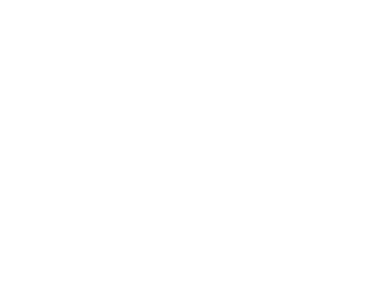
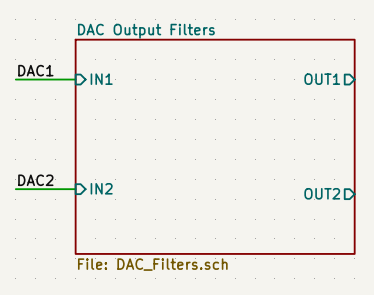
label: none -> DAC1 (35, 70)
wire: none -> (15, 79) (75, 79)
sheet pin: none -> IN1 (101, 79)
sheet pin: none -> OUT1 (322, 79)
sheet DAC Output Filters: none -> File: DAC_Filters.sch (215, 146)
label: none -> DAC2 (35, 180)
sheet pin: none -> IN2 (101, 188)
wire: none -> (15, 189) (75, 189)
sheet pin: none -> OUT2 (322, 193)

